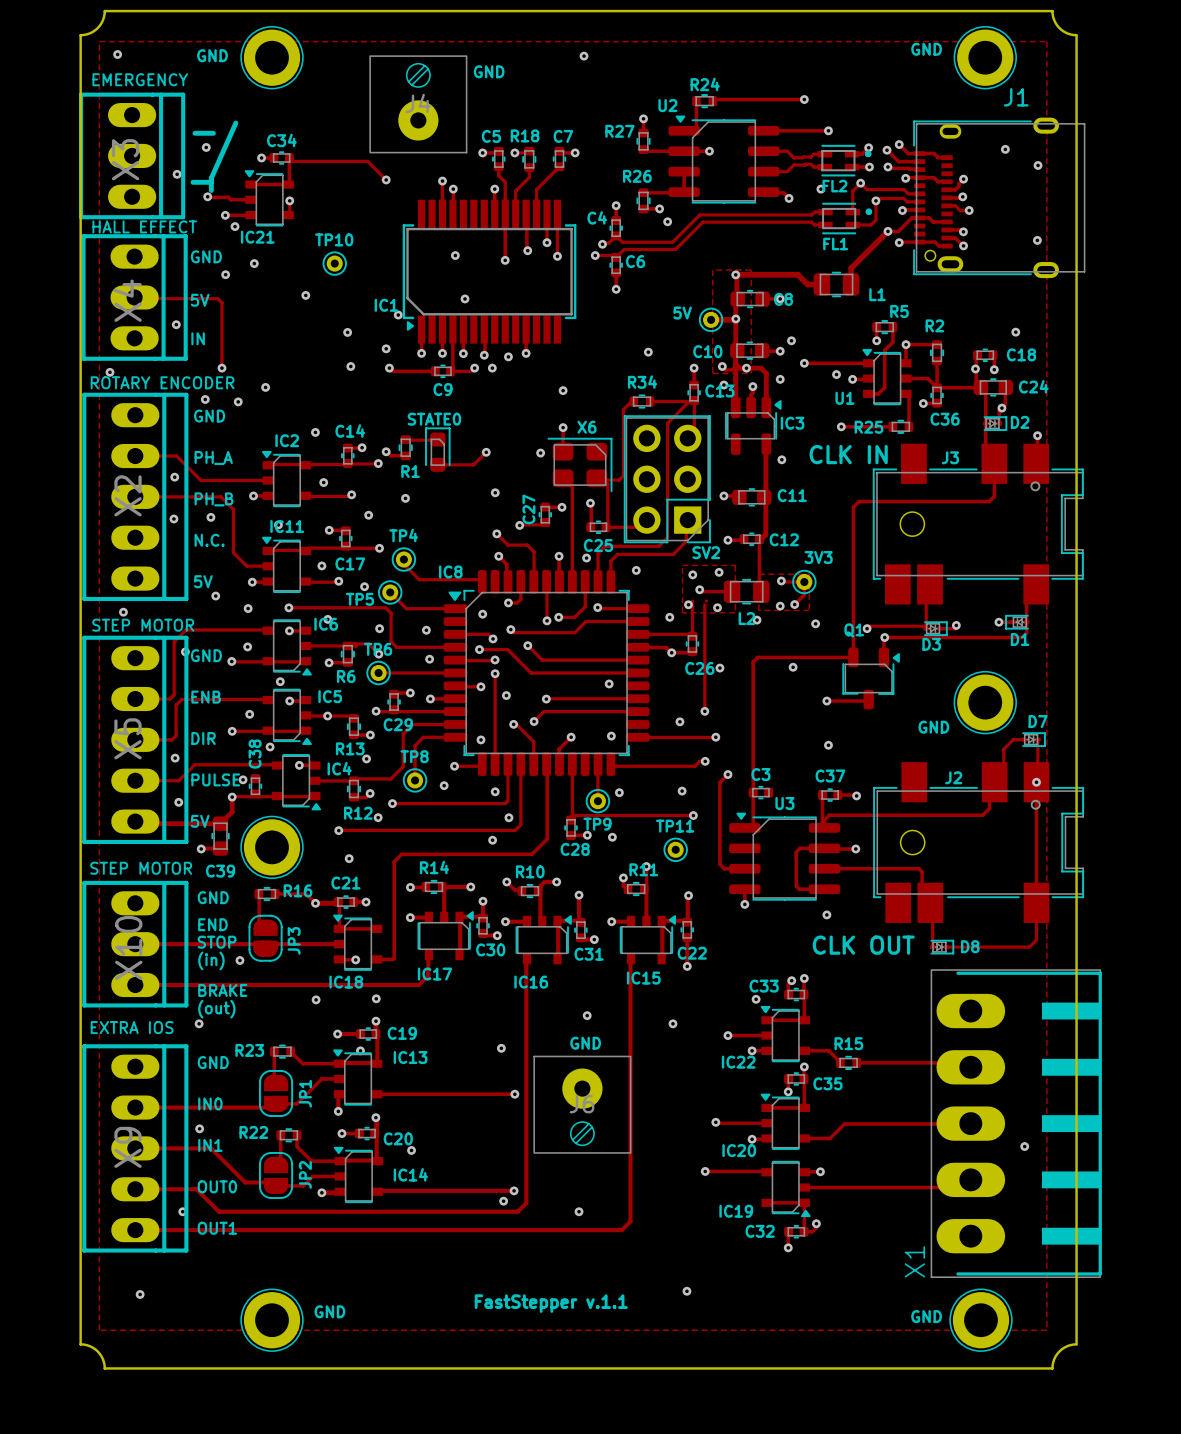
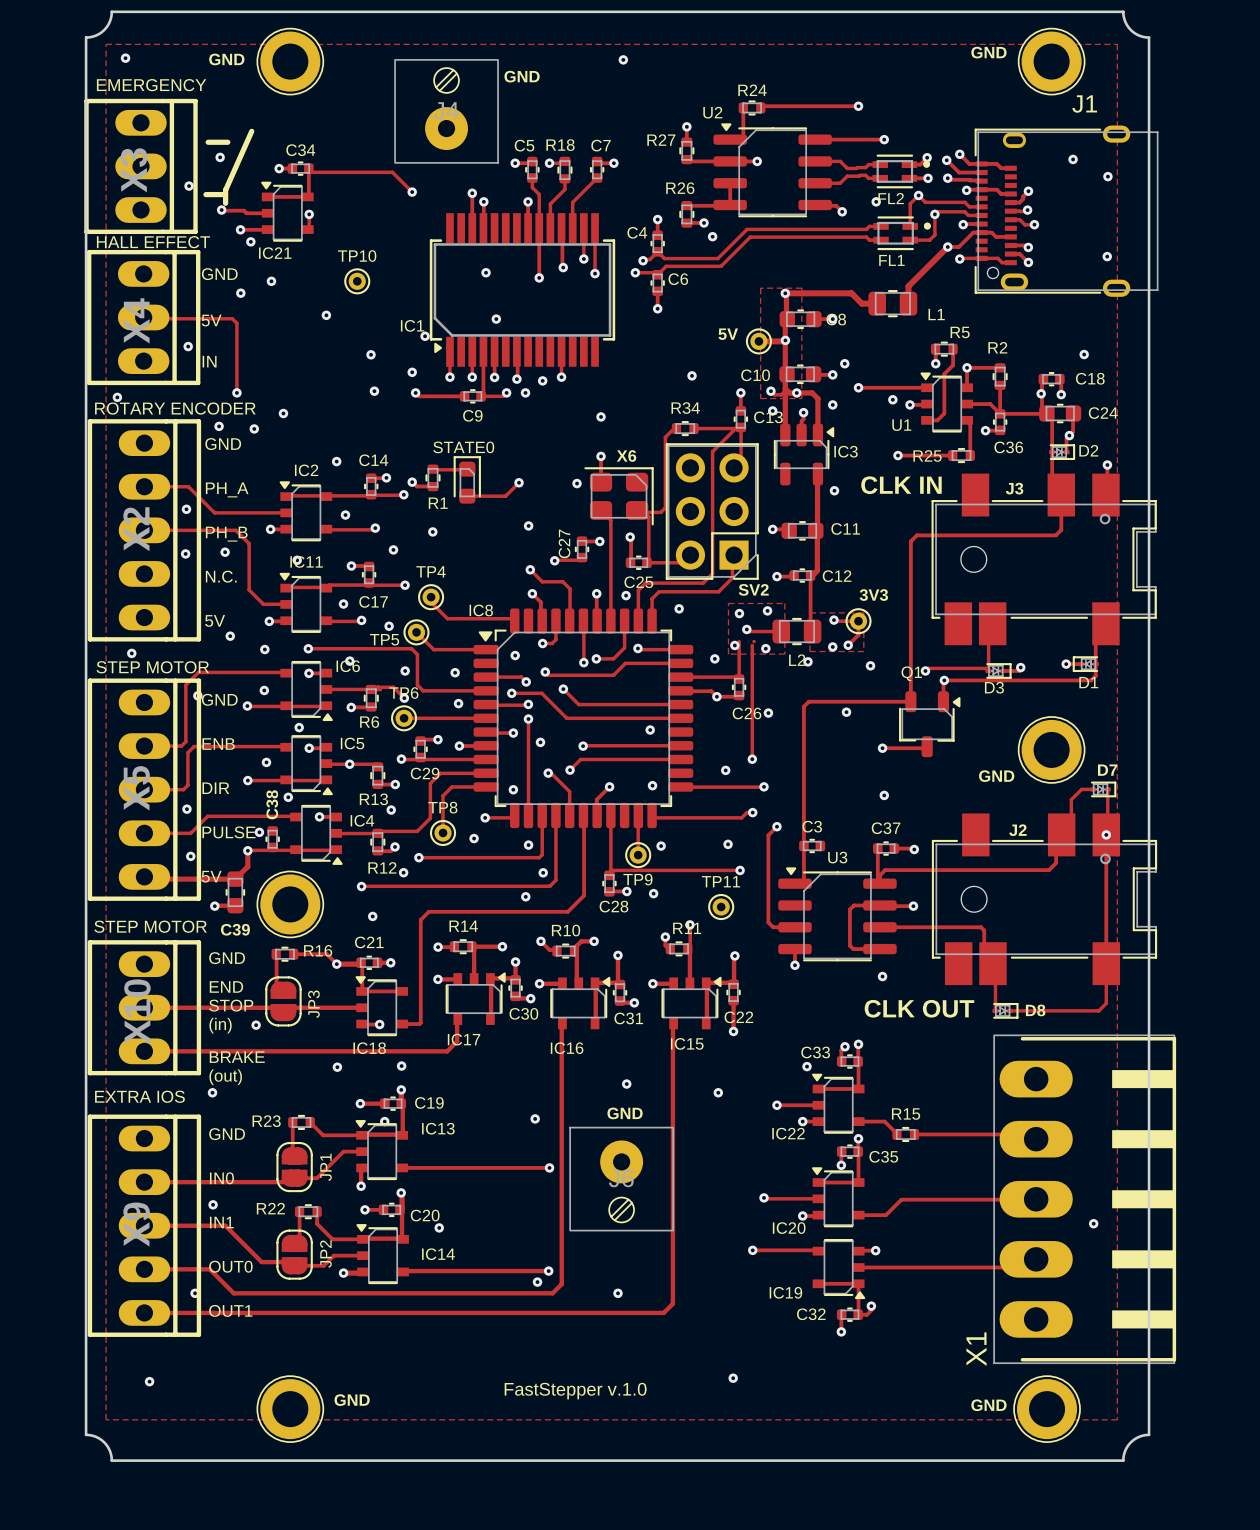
text: FastStepper v.1.1 (551, 1303) -> FastStepper v.1.0 (575, 1391)

